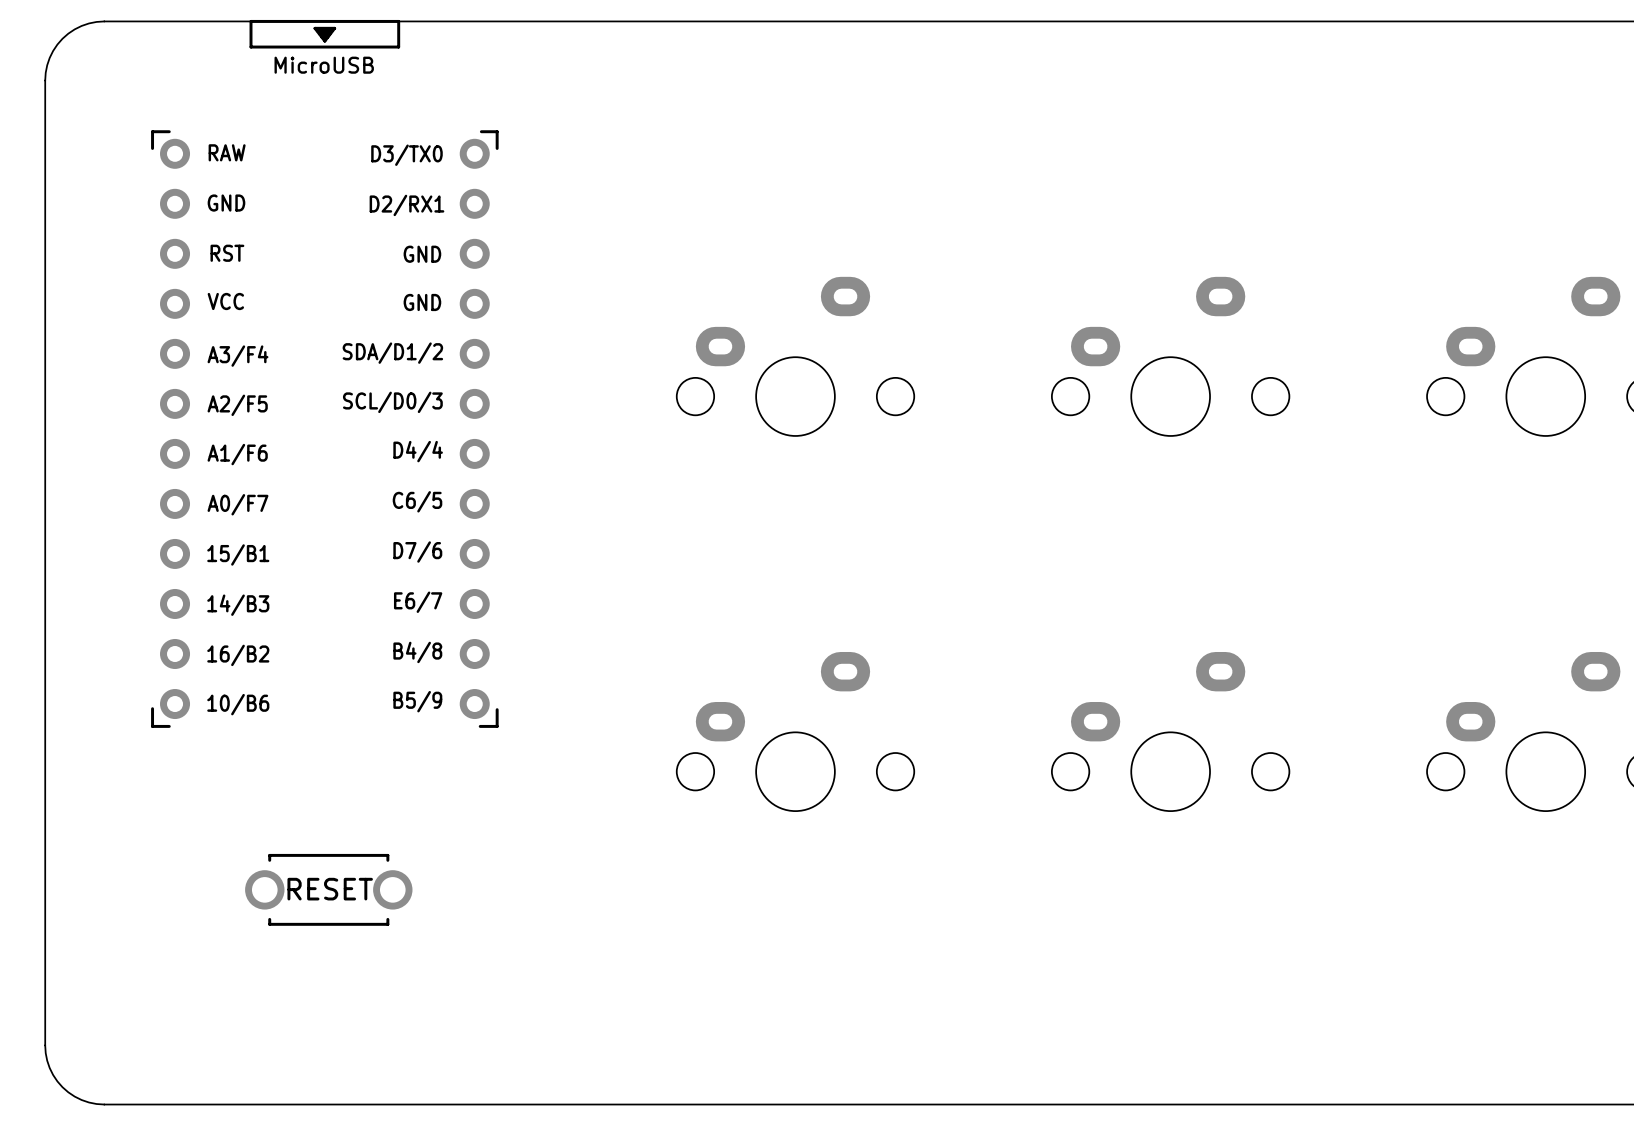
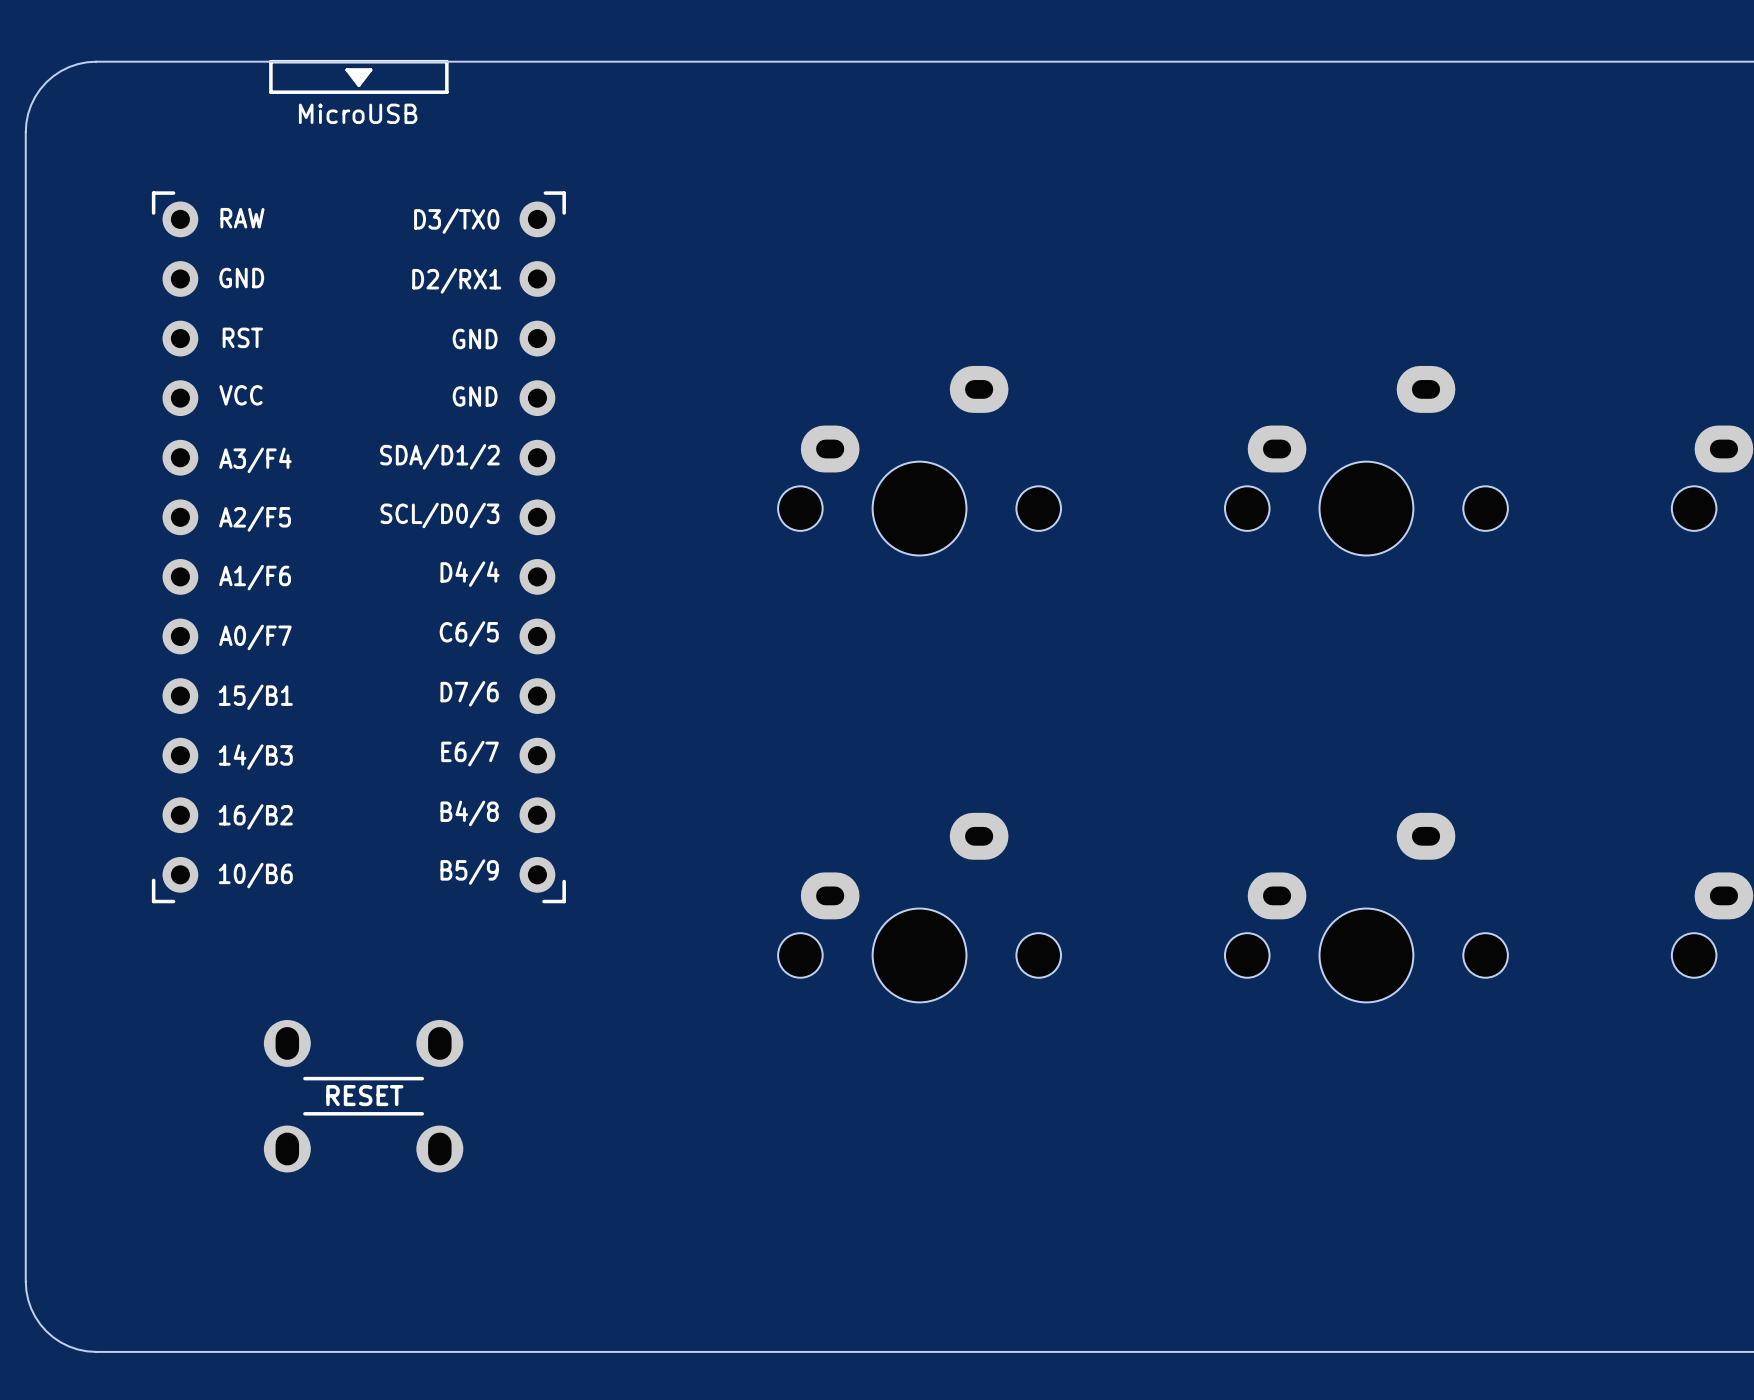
part footprint: [245, 853, 413, 926] -> [263, 1019, 464, 1173]

